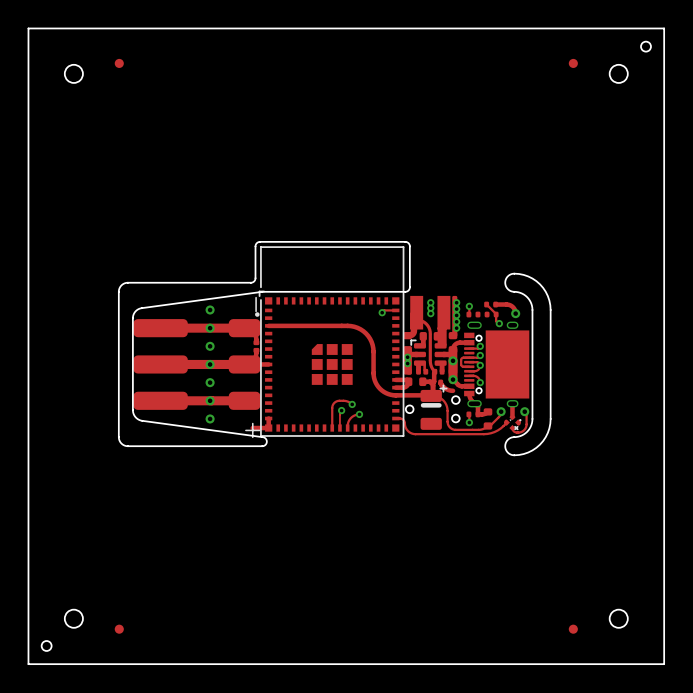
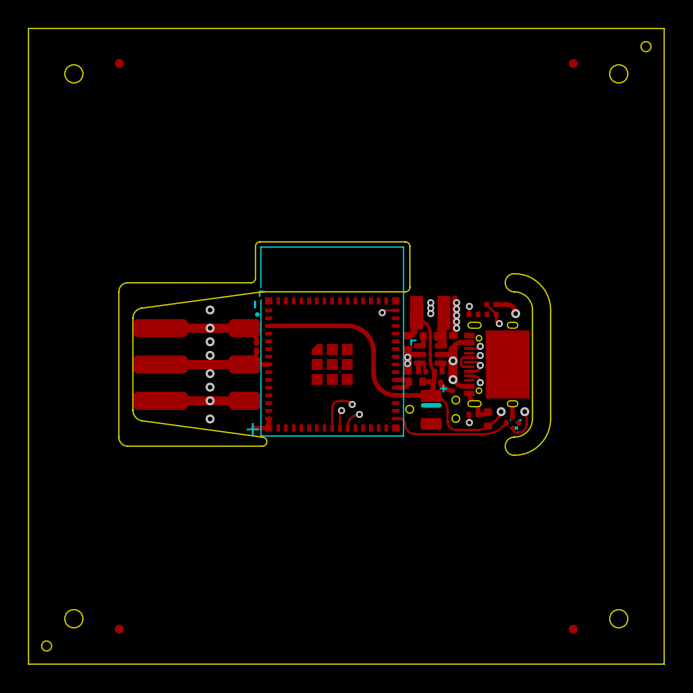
via: none -> (210, 341)
via: (210, 346) -> none
via: none -> (210, 355)
via: (210, 364) -> none
via: none -> (210, 373)
via: (210, 382) -> none
via: none -> (210, 387)

